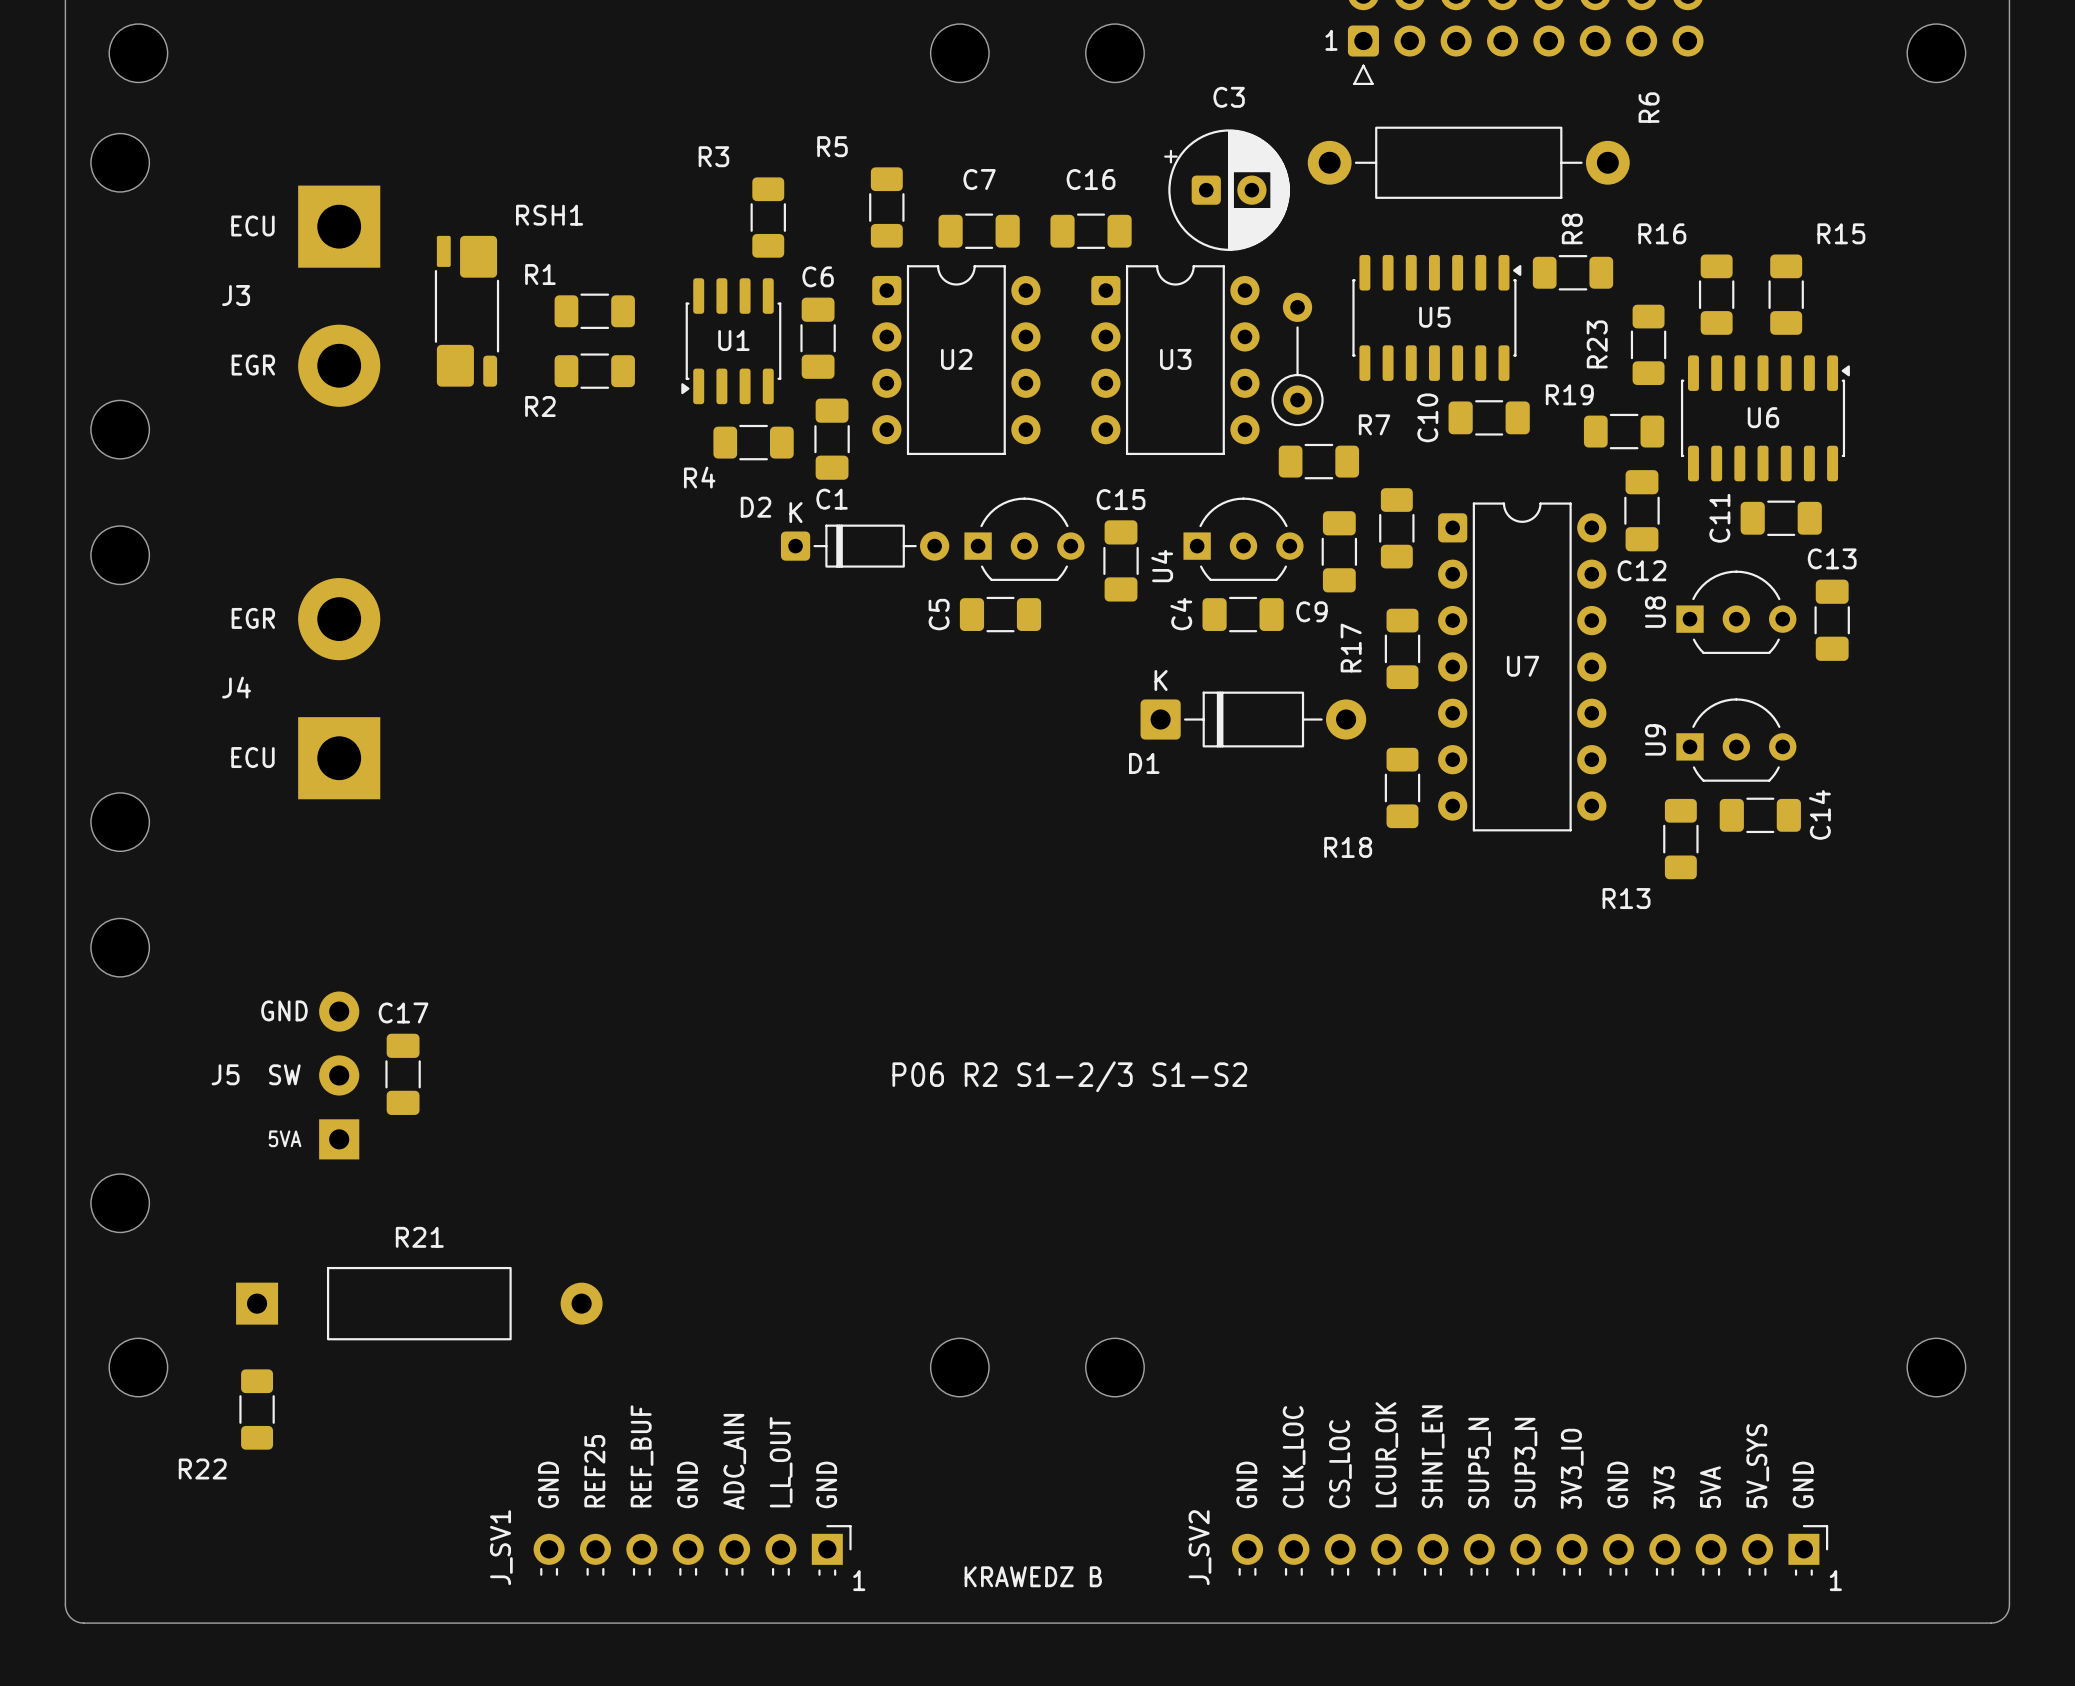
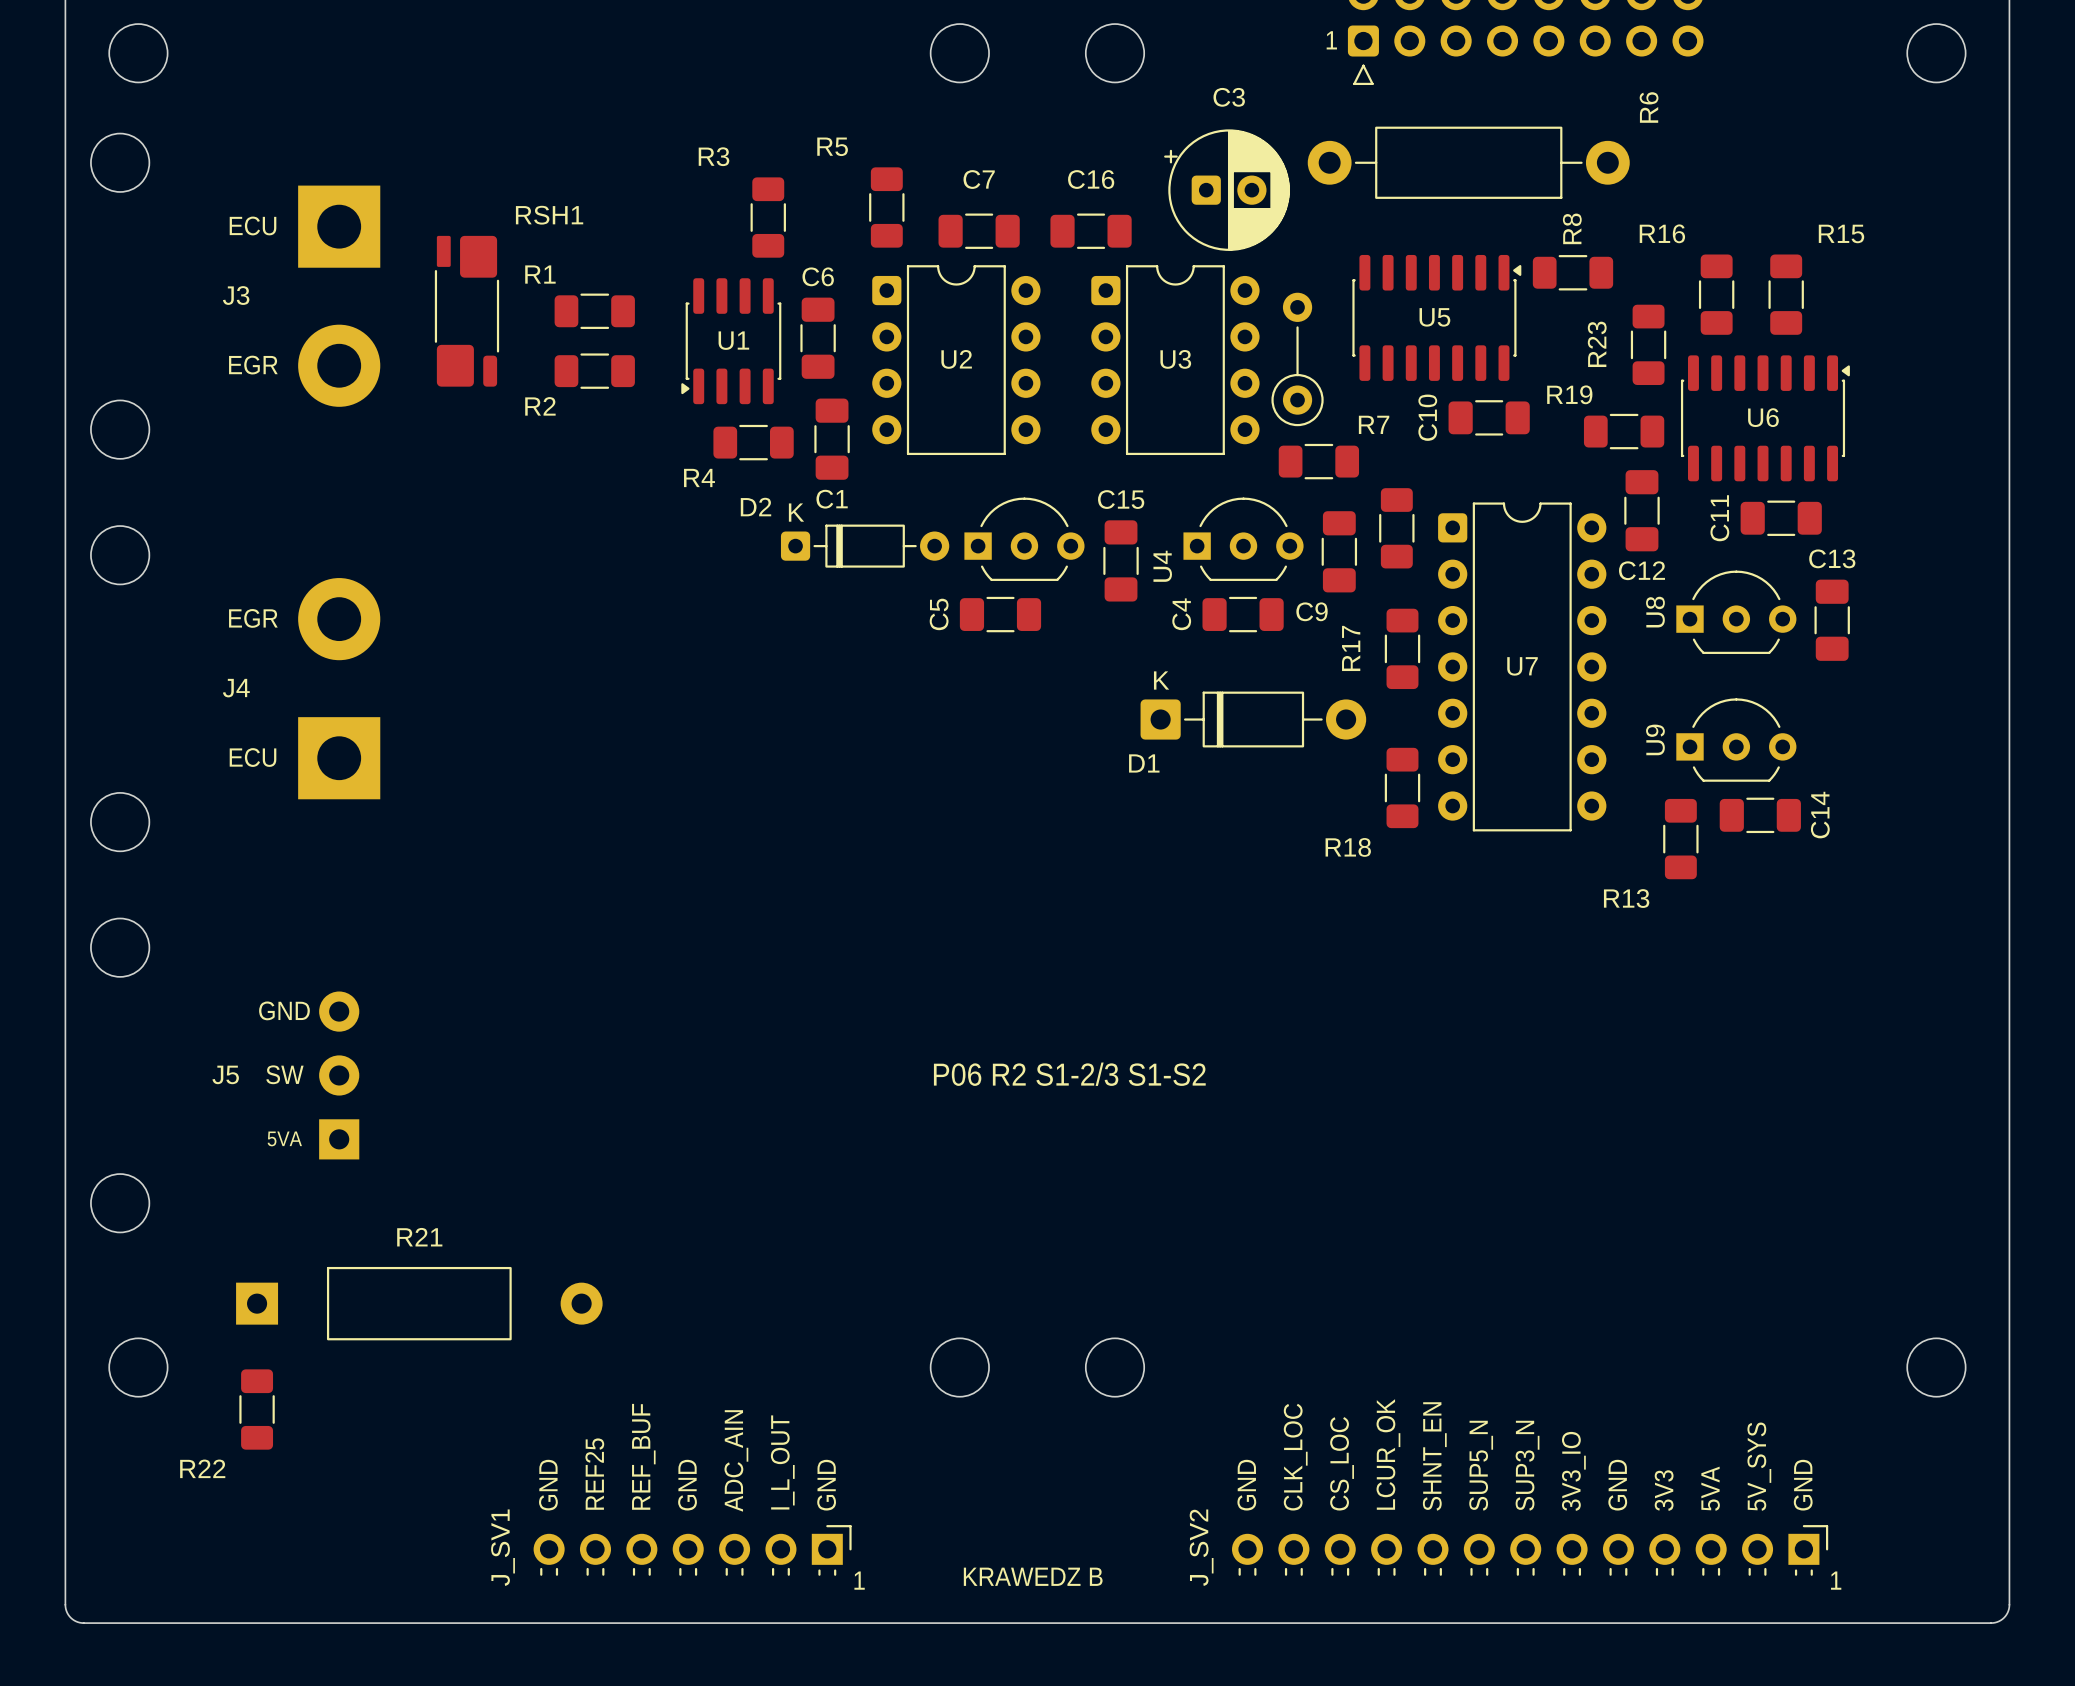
C17: (403, 1074) -> none

